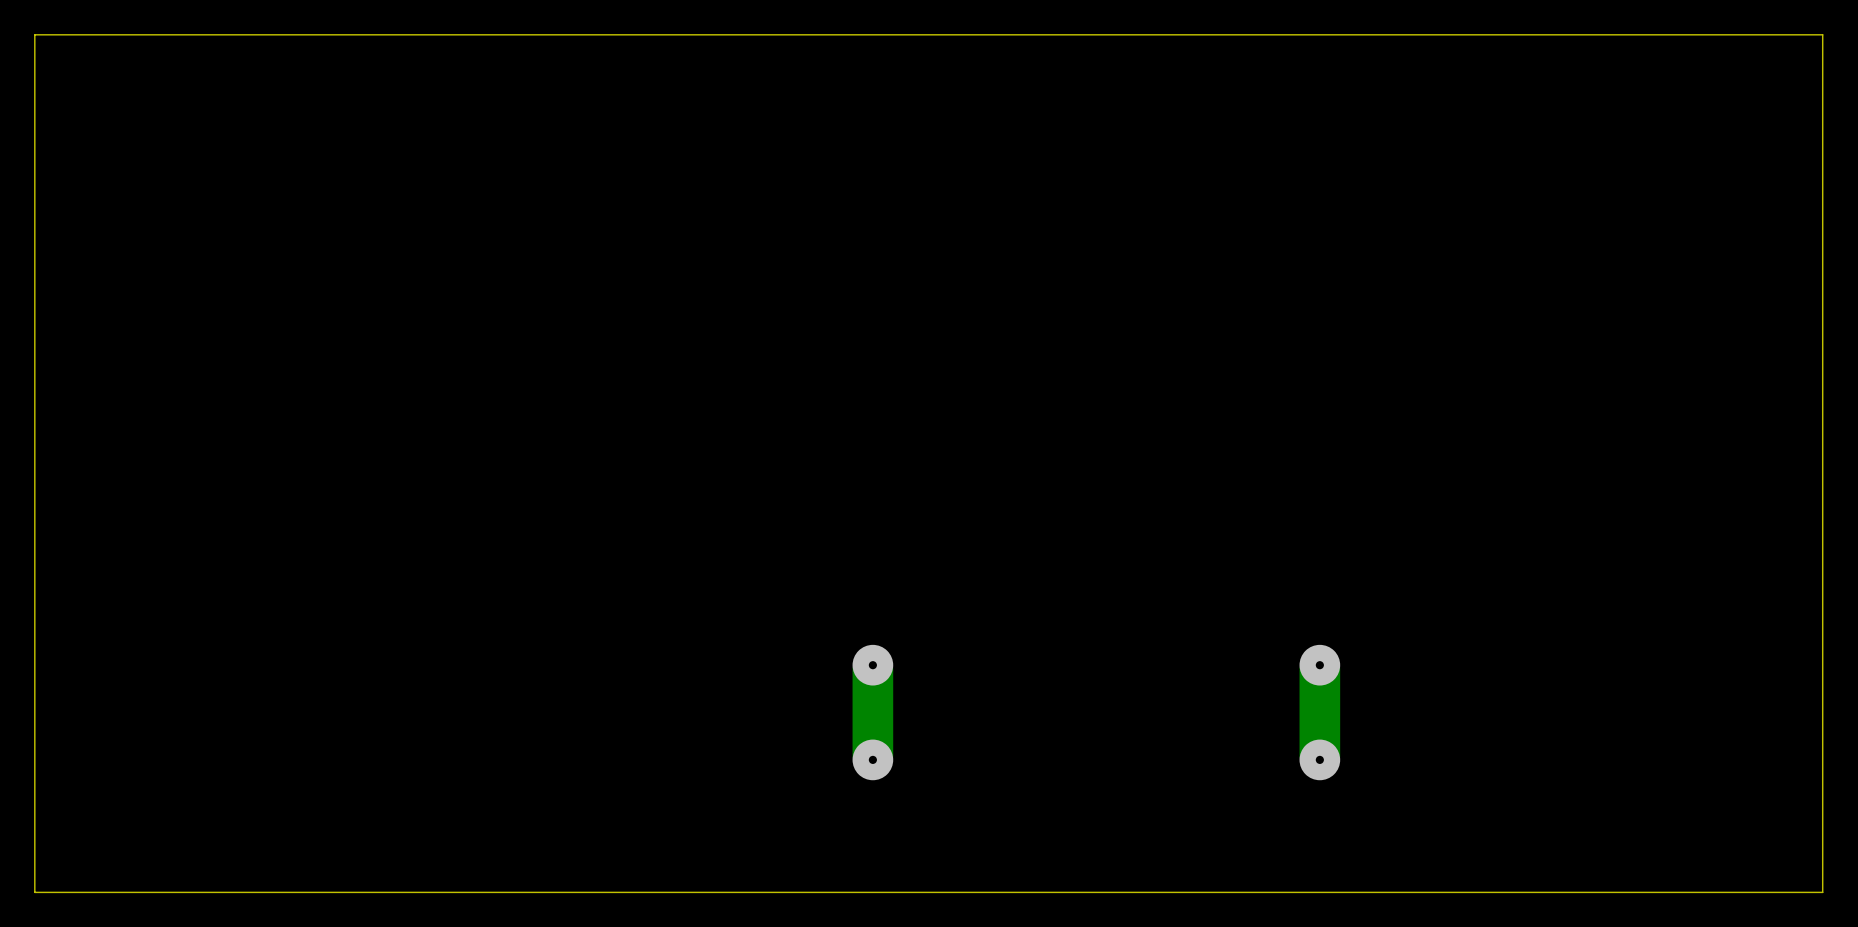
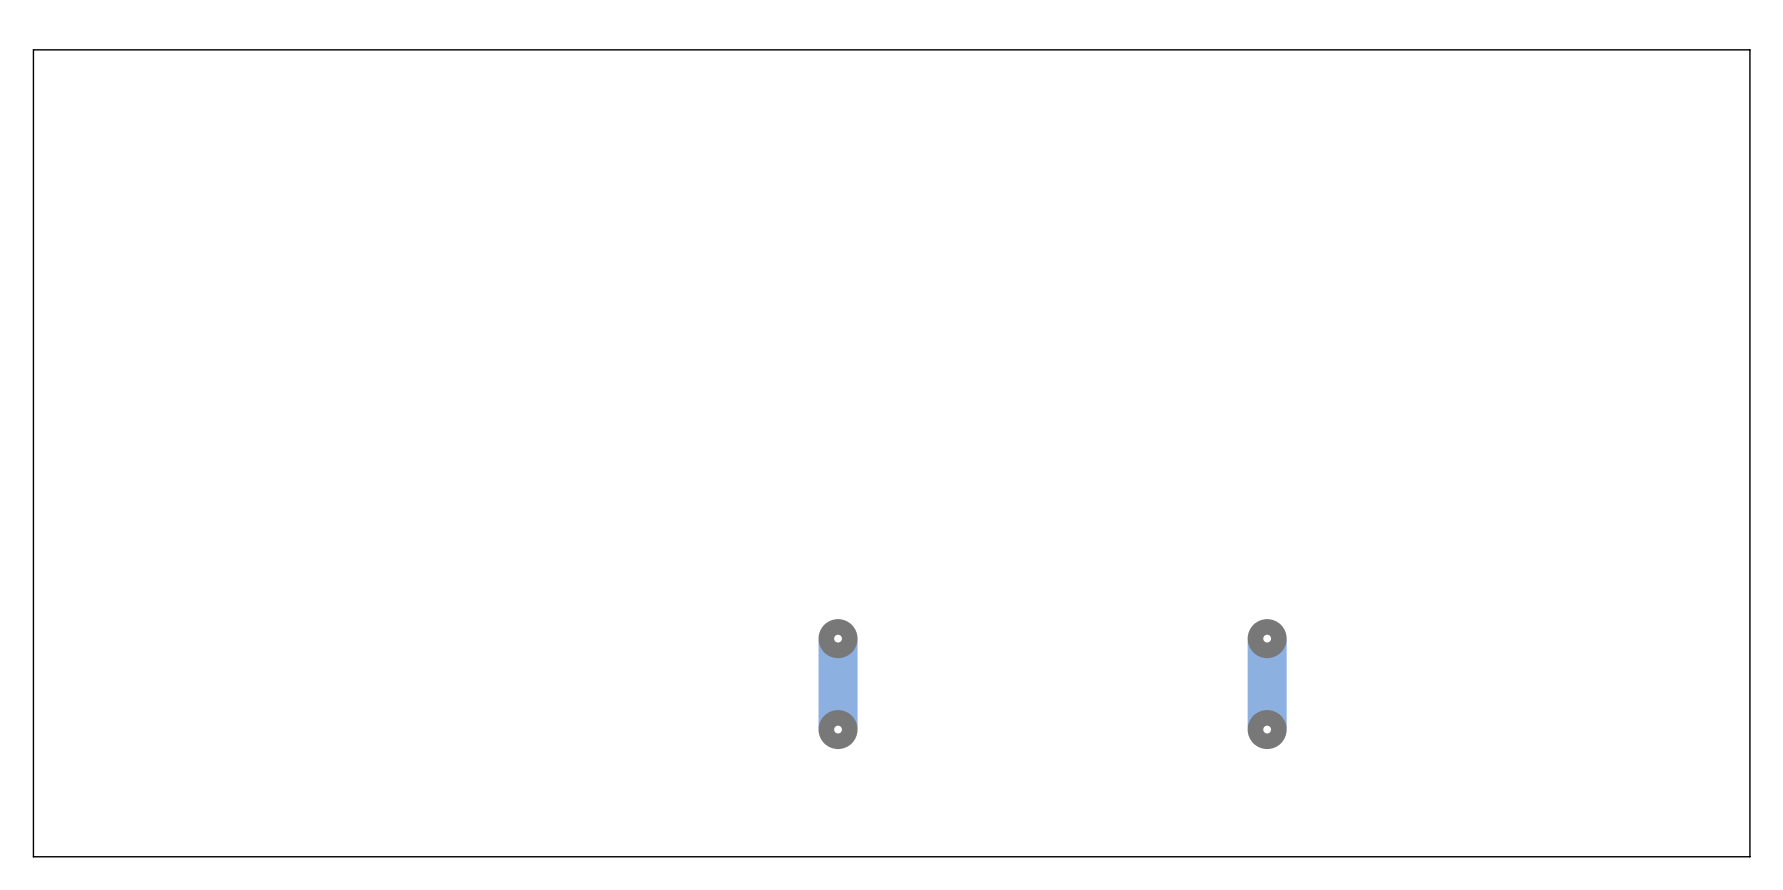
board edge: (1822, 51) (1822, 34) (34, 34) (34, 51) -> (1749, 49) (33, 49)

